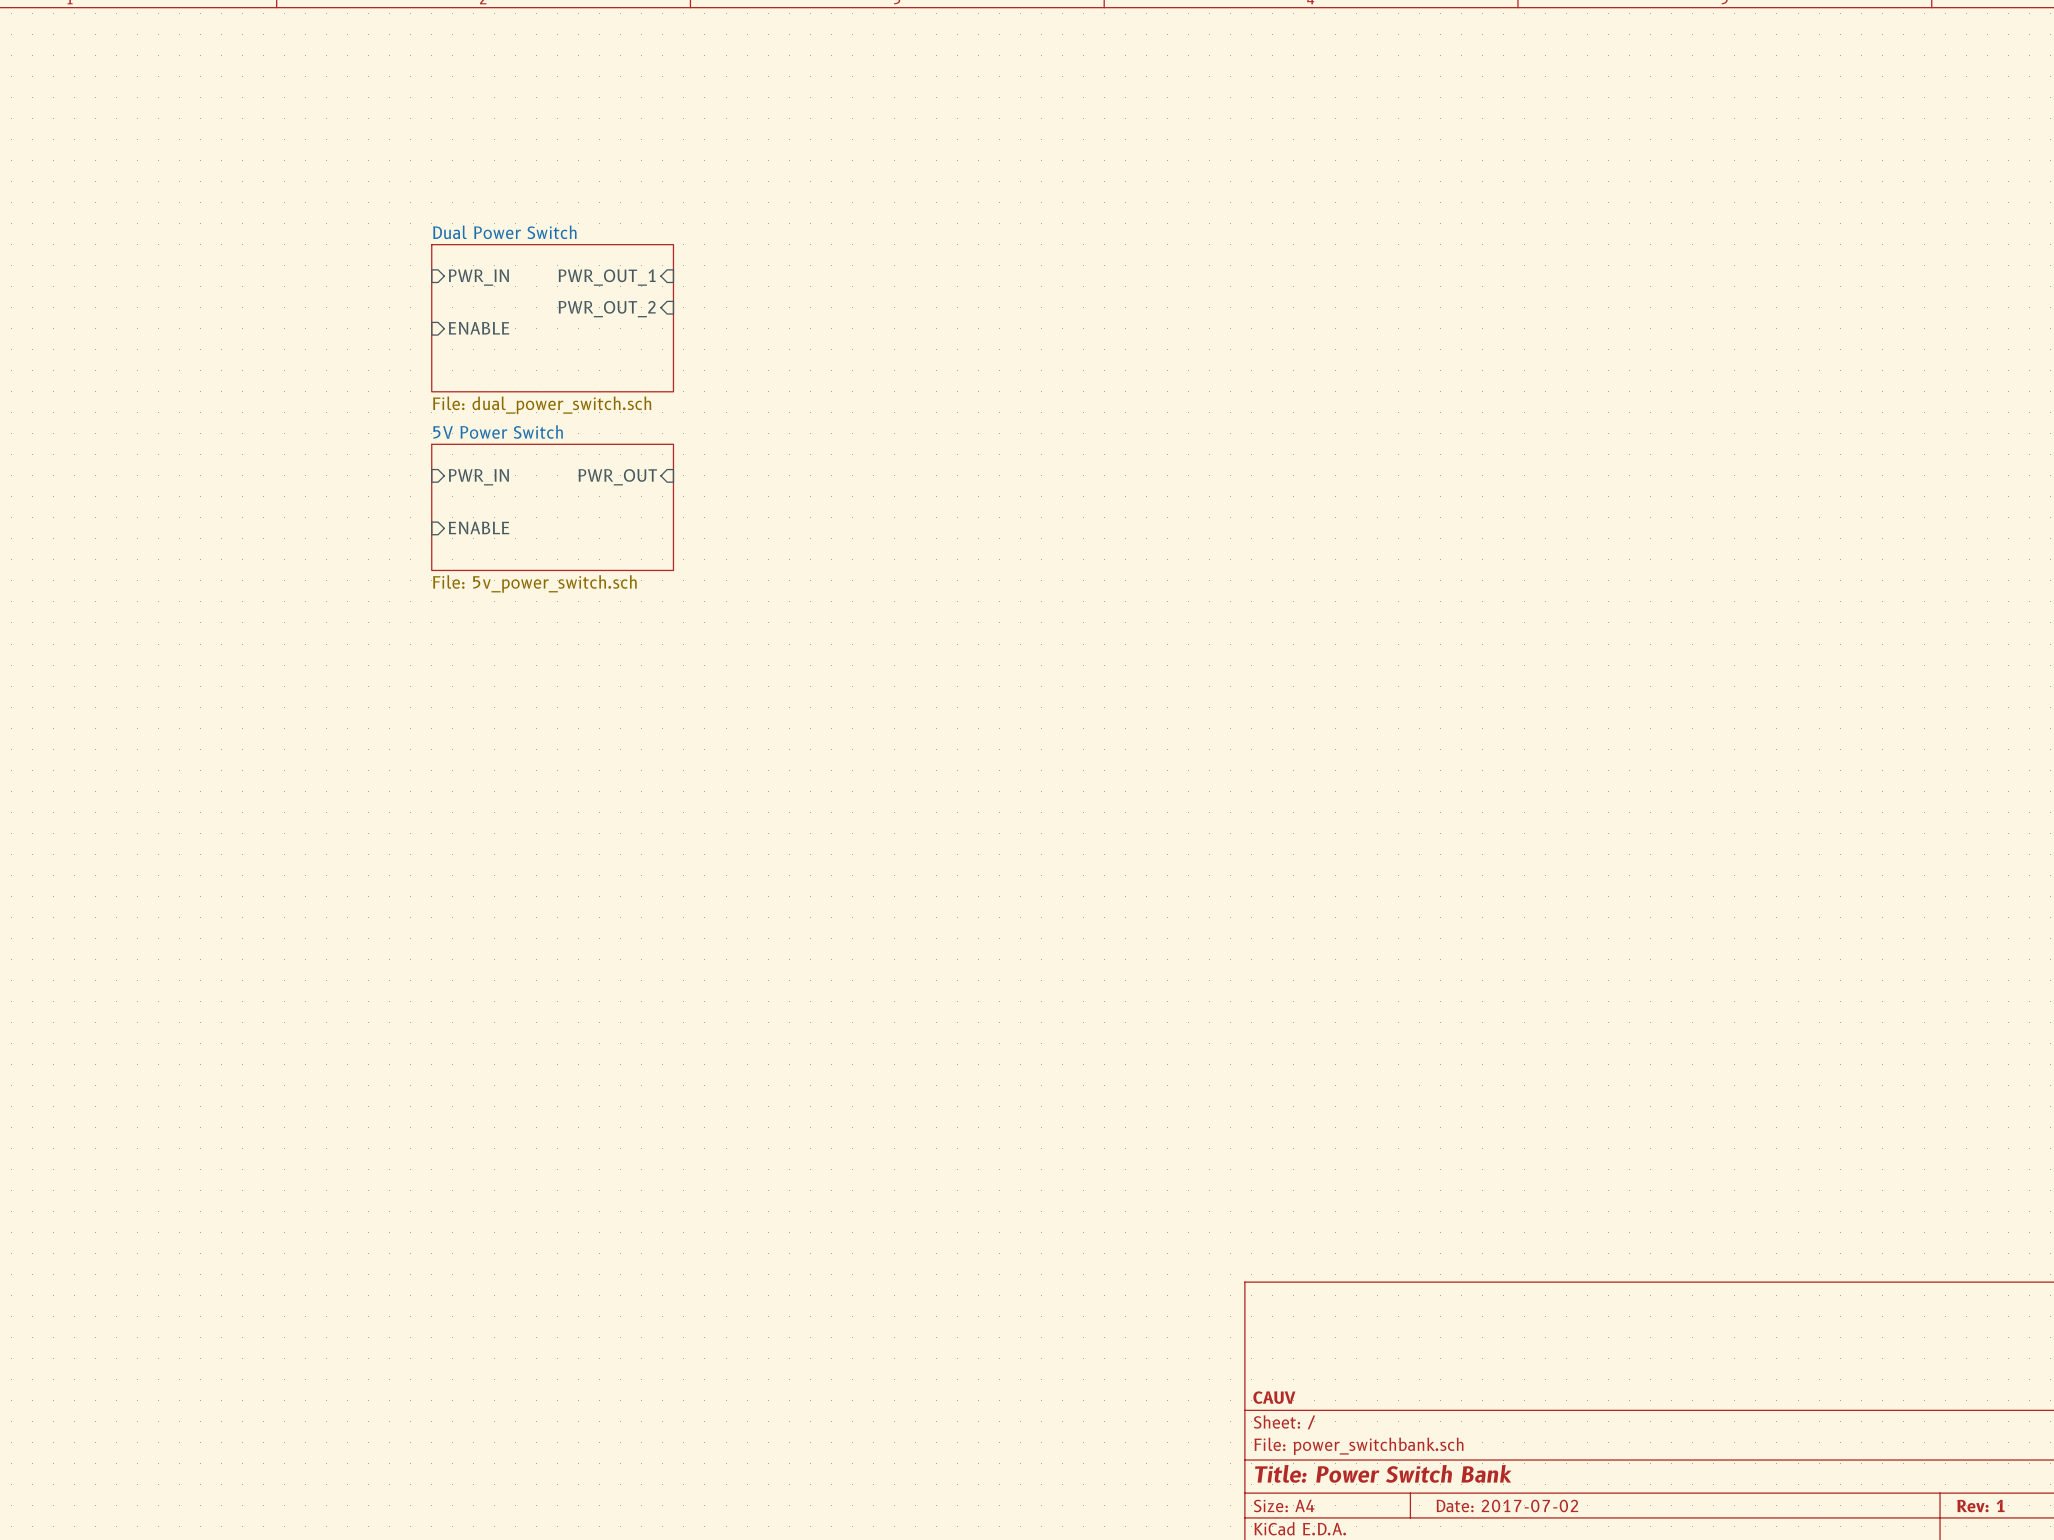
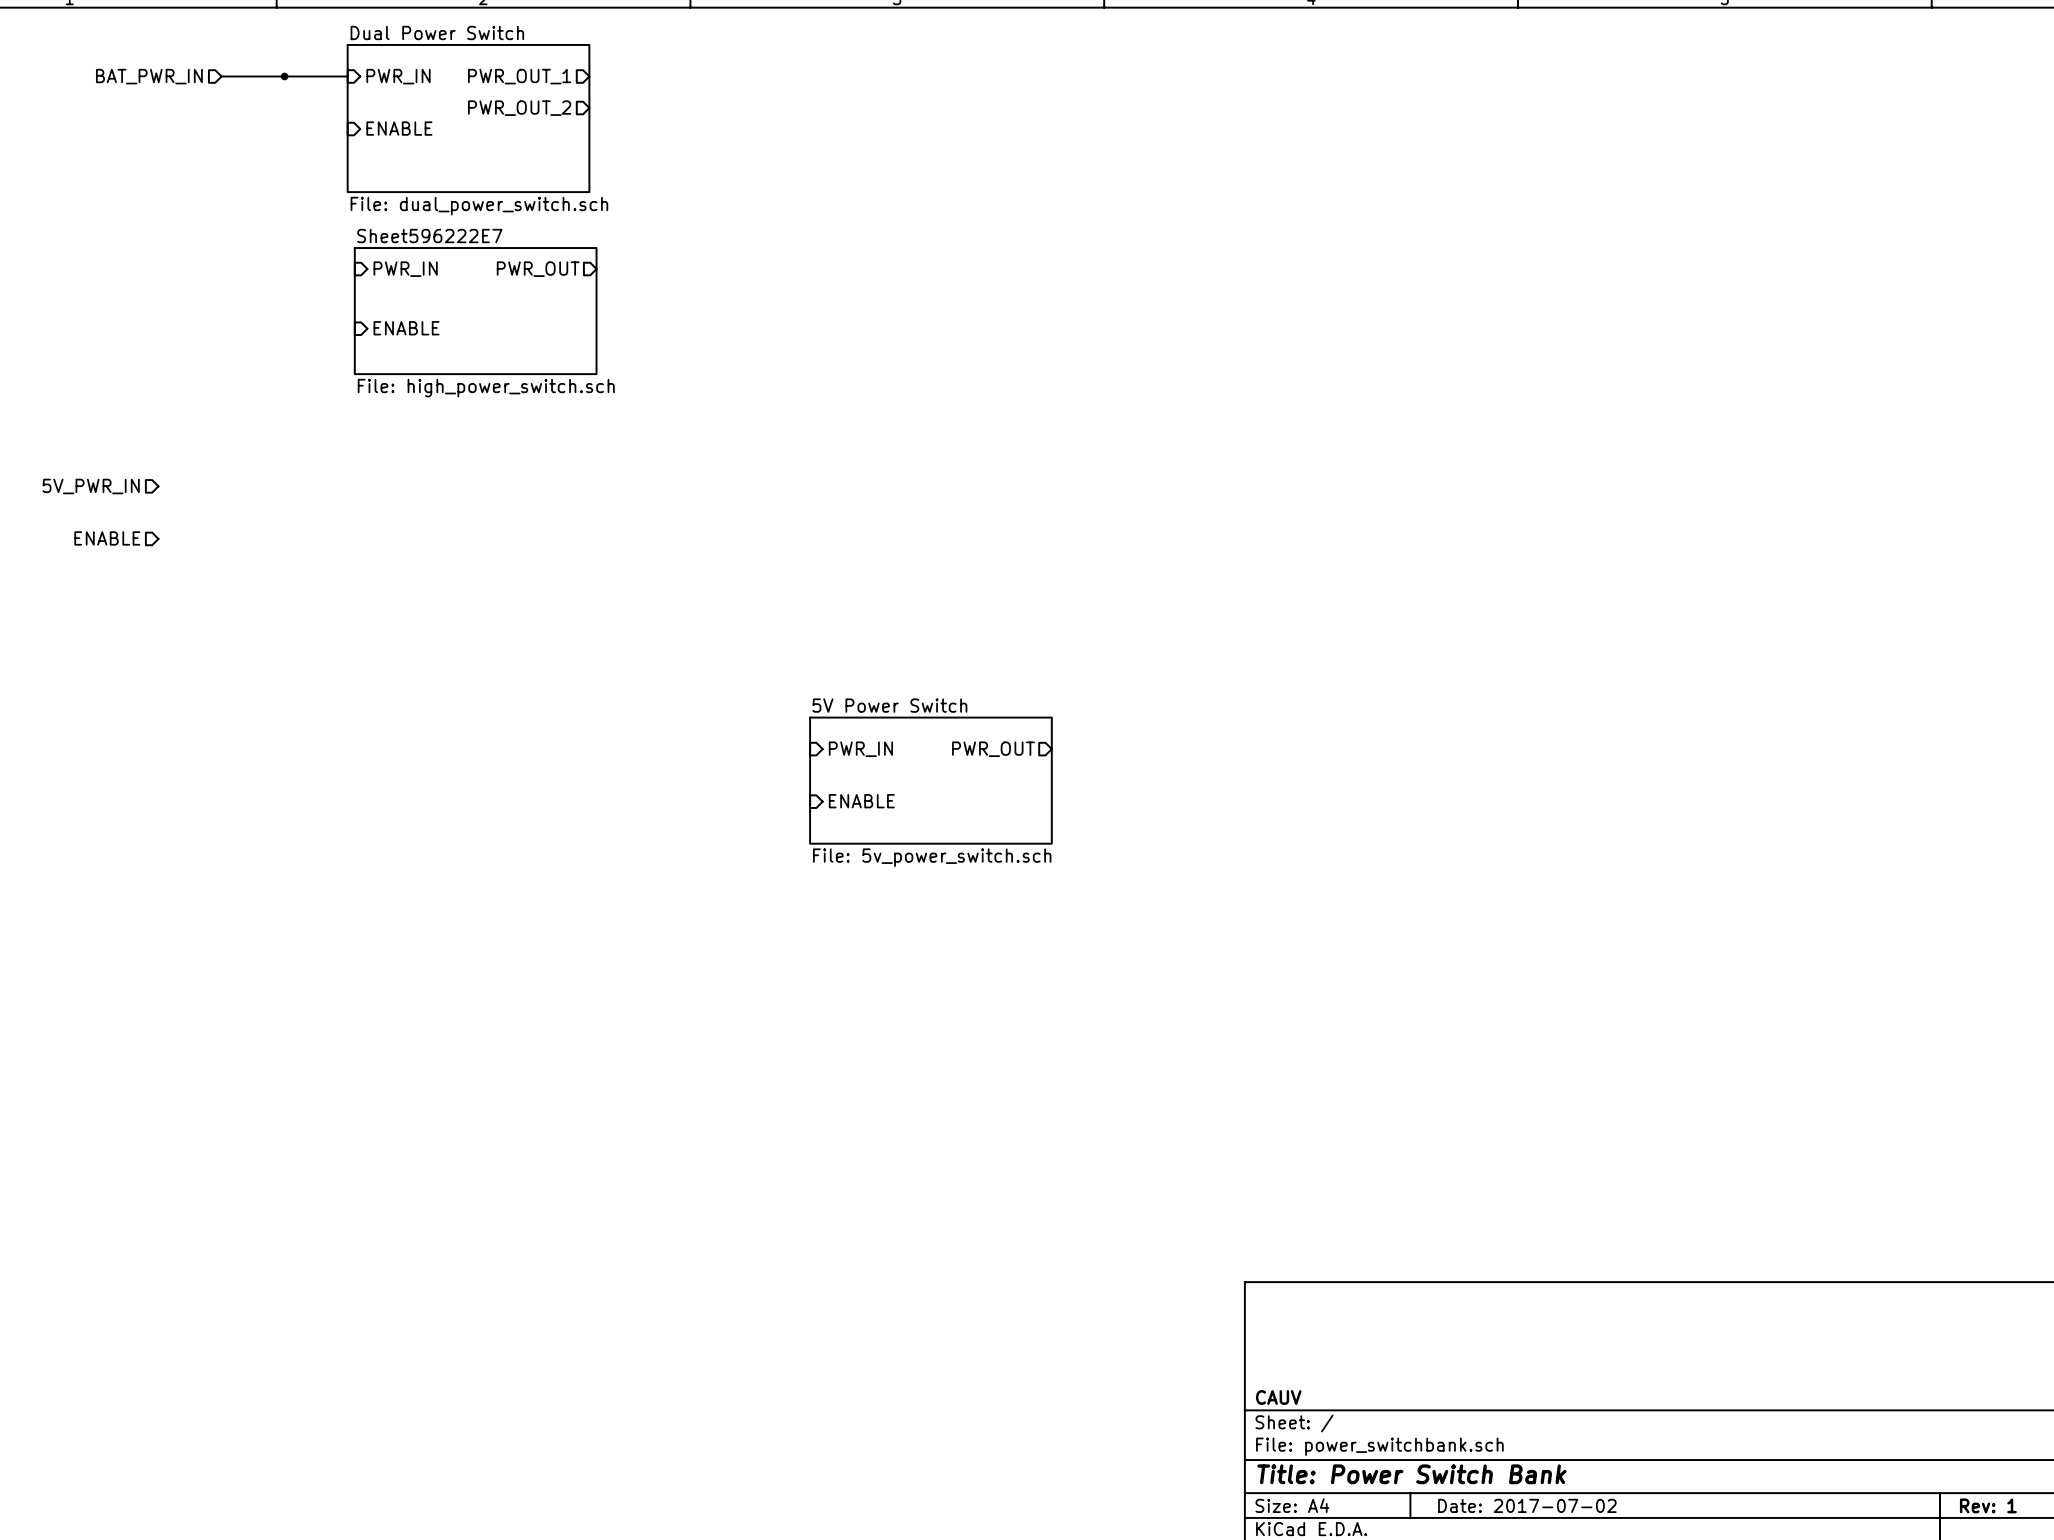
wire: none -> (221, 76) (347, 76)
junction: none -> (284, 76)
hierarchical label: none -> BAT_PWR_IN (149, 76)
sheet pin: none -> PWR_IN (398, 76)
sheet pin: none -> PWR_OUT_1 (519, 76)
sheet pin: none -> PWR_OUT_2 (519, 108)
sheet Dual Power Switch: none -> File: dual_power_switch.sch (468, 118)
sheet pin: none -> ENABLE (399, 128)
sheet pin position: PWR_IN (478, 277) -> PWR_IN (405, 269)
sheet pin shape: input (607, 277) -> output (538, 269)
sheet pin: PWR_OUT_1 (607, 277) -> PWR_OUT (538, 269)
sheet pin: PWR_OUT_2 (607, 309) -> none
sheet Sheet596222E7: none -> File: high_power_switch.sch (475, 311)
sheet Dual Power Switch: File: dual_power_switch.sch (552, 318) -> none
sheet pin position: ENABLE (479, 328) -> ENABLE (406, 328)
sheet pin: PWR_IN (478, 477) -> none
sheet pin: PWR_OUT (617, 477) -> none
hierarchical label: none -> 5V_PWR_IN (91, 486)
sheet 5V Power Switch position: (552, 507) -> (930, 780)
sheet pin: ENABLE (479, 527) -> none
hierarchical label: none -> ENABLE (107, 538)
sheet pin: none -> PWR_IN (860, 749)
sheet pin: none -> PWR_OUT (993, 749)
sheet pin: none -> ENABLE (861, 801)

